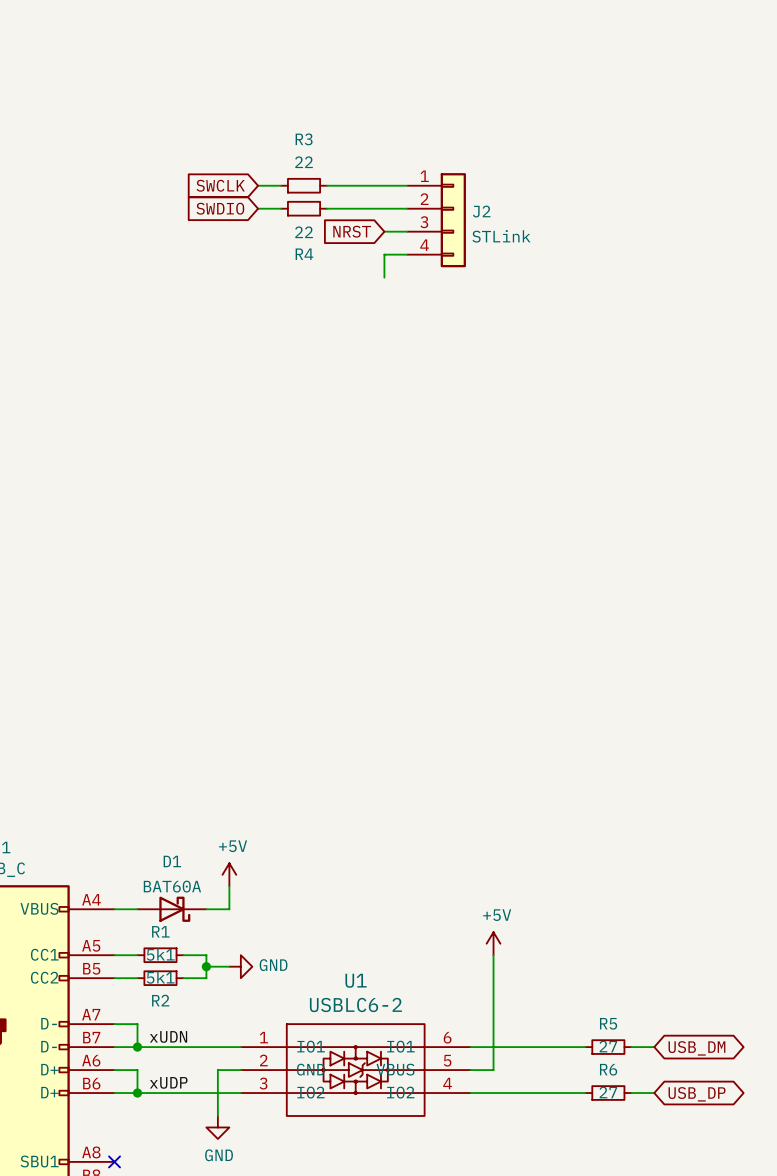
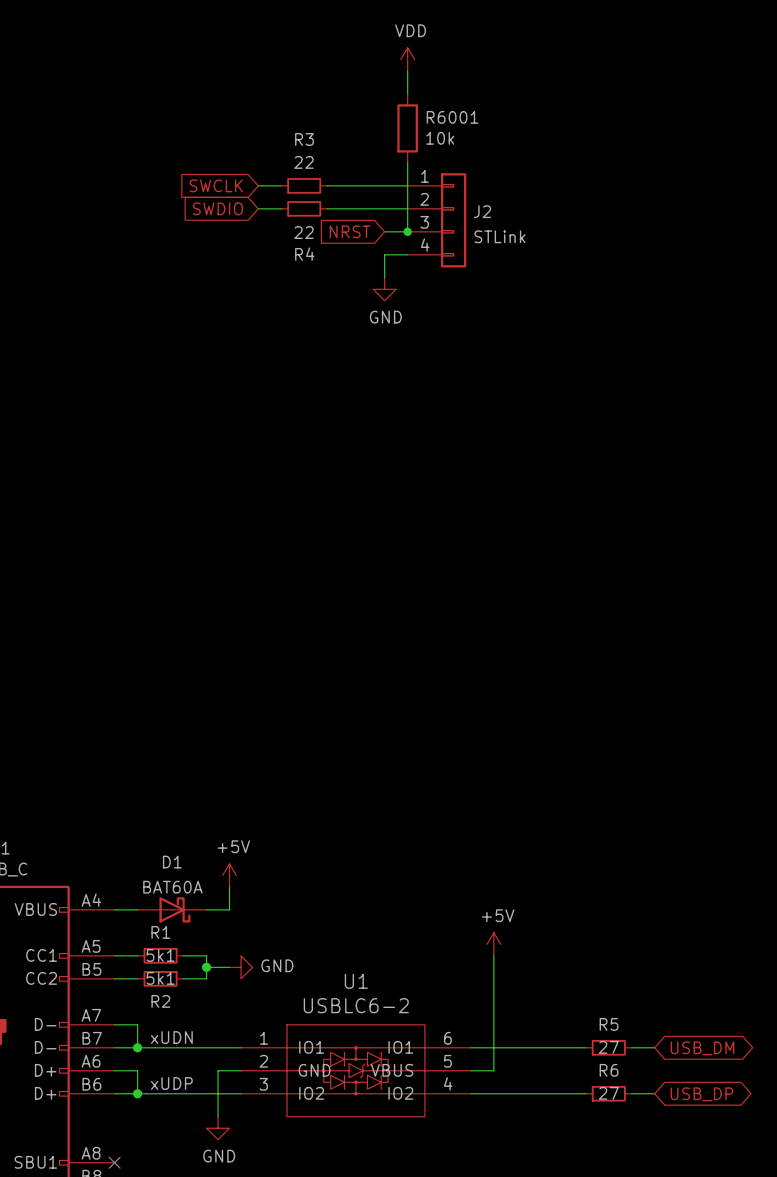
power symbol: none -> VDD (407, 59)
wire: none -> (407, 70) (407, 93)
R6001: none -> 10k (407, 128)
wire: none -> (407, 162) (407, 231)
junction: none -> (407, 231)
power symbol: none -> GND (384, 289)

